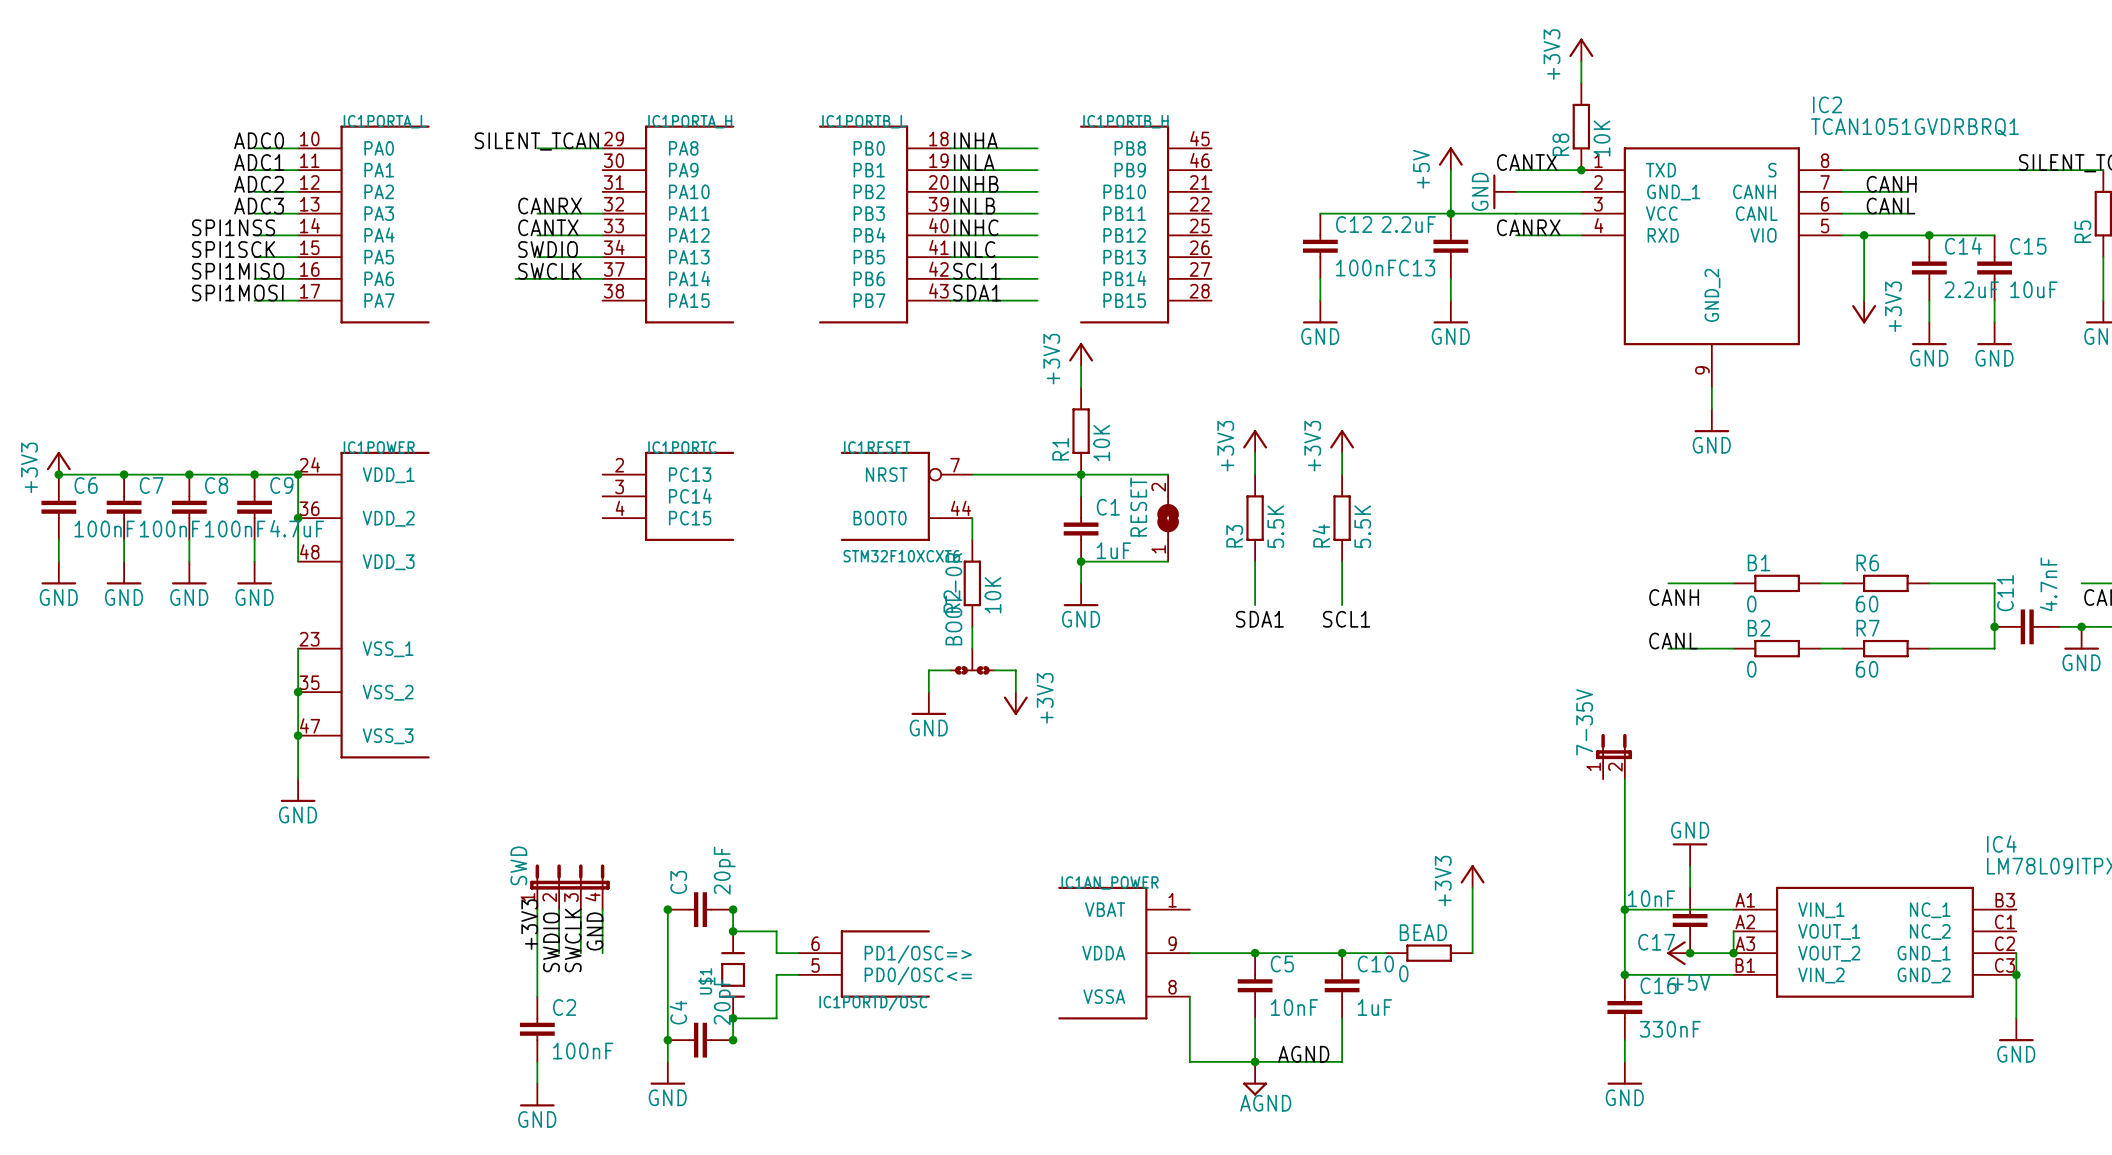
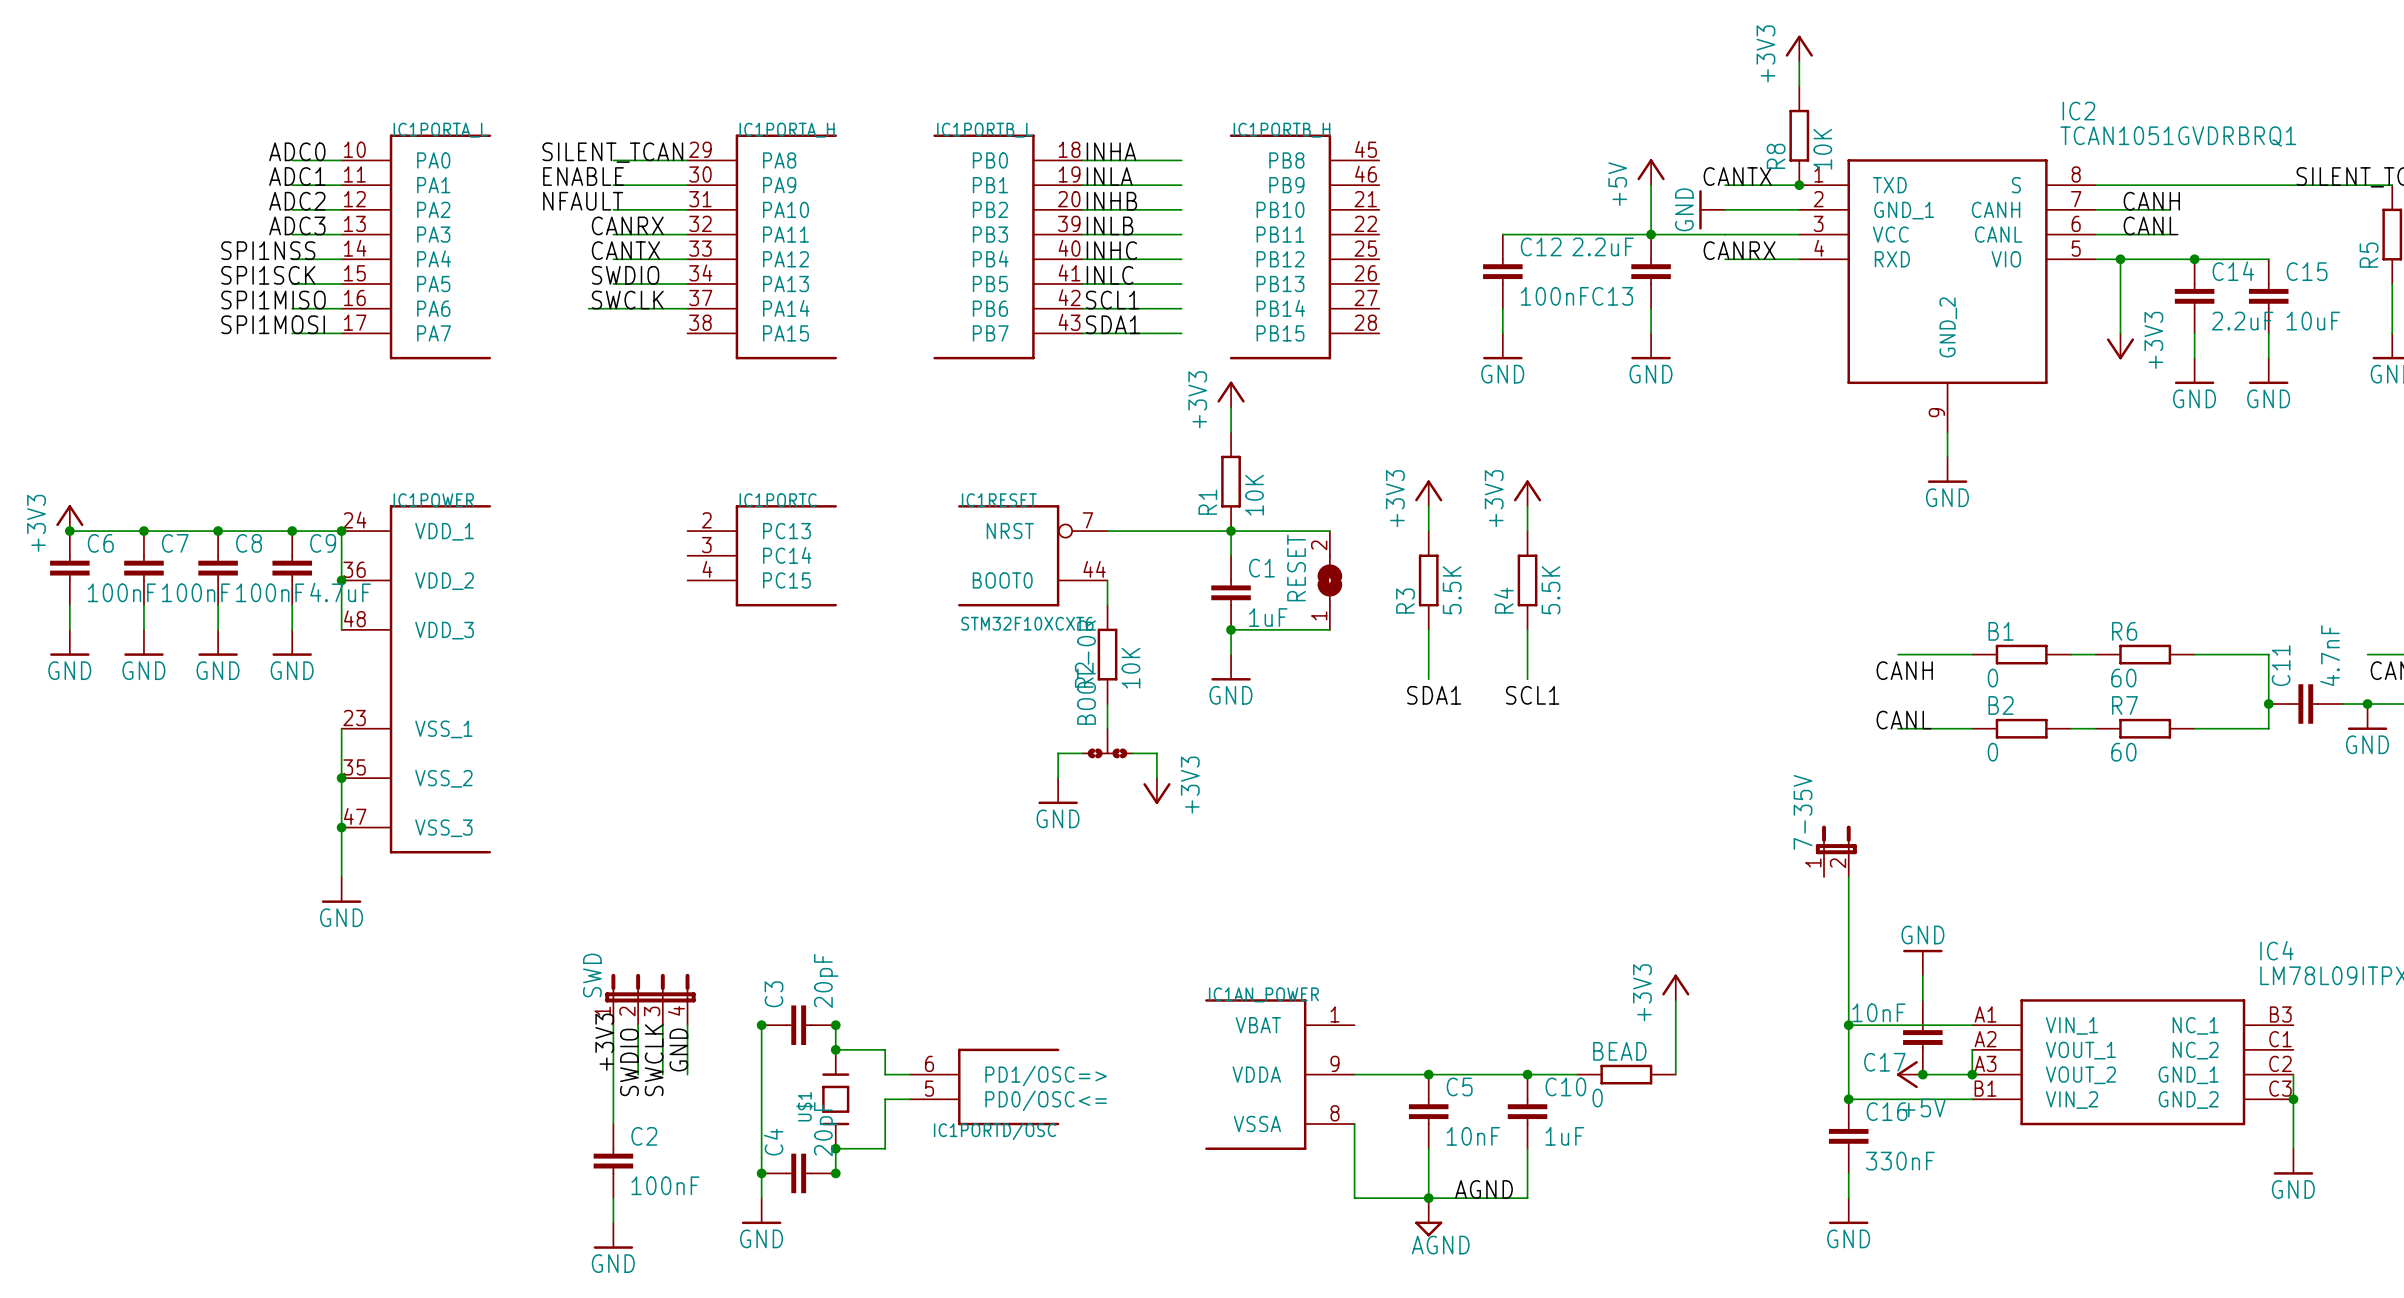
label: none -> ENABLE (583, 176)
wire: none -> (613, 185) (687, 185)
label: none -> NFAULT (583, 201)
wire: none -> (613, 209) (687, 209)

